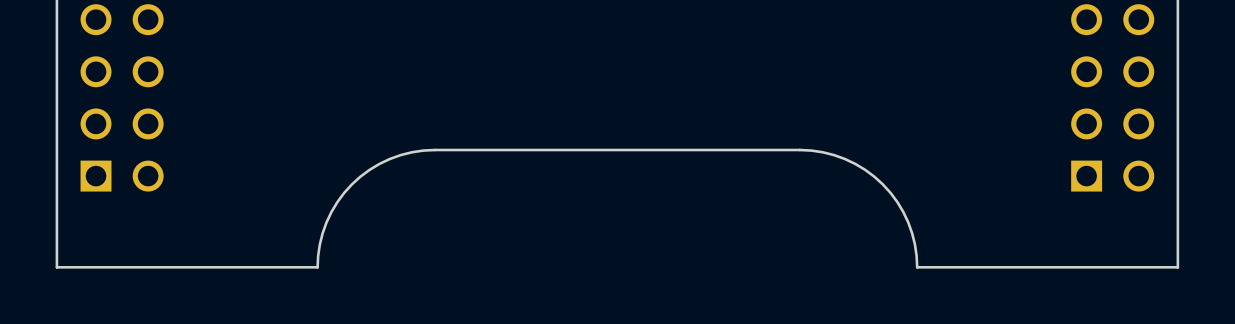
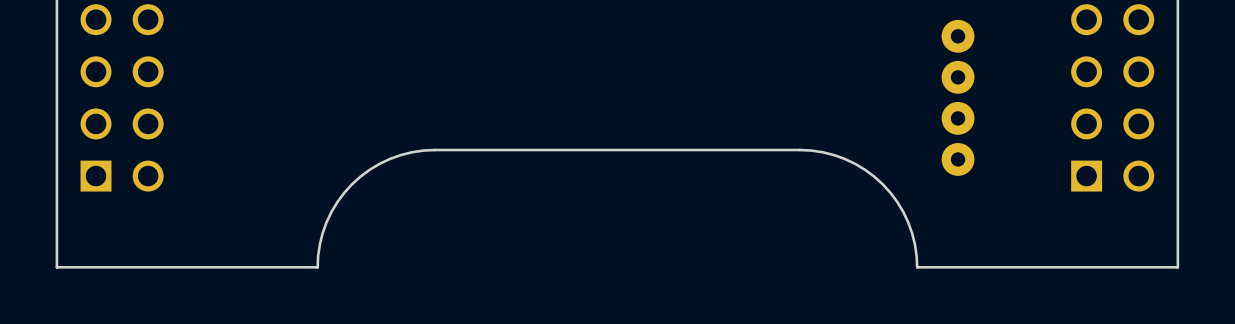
part: none -> (958, 97)

